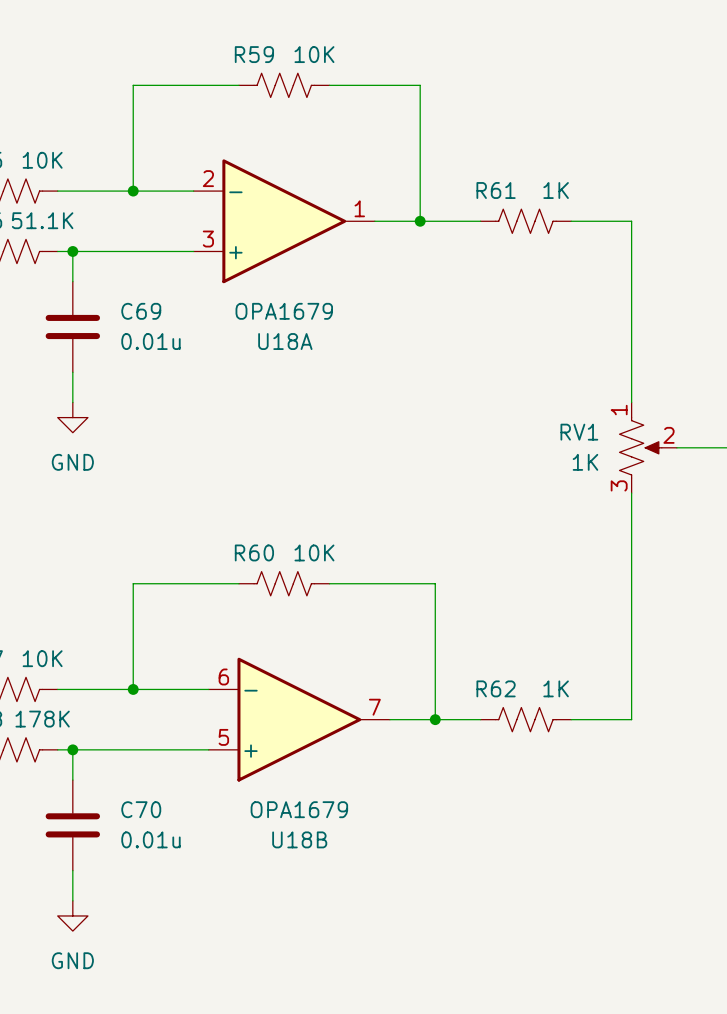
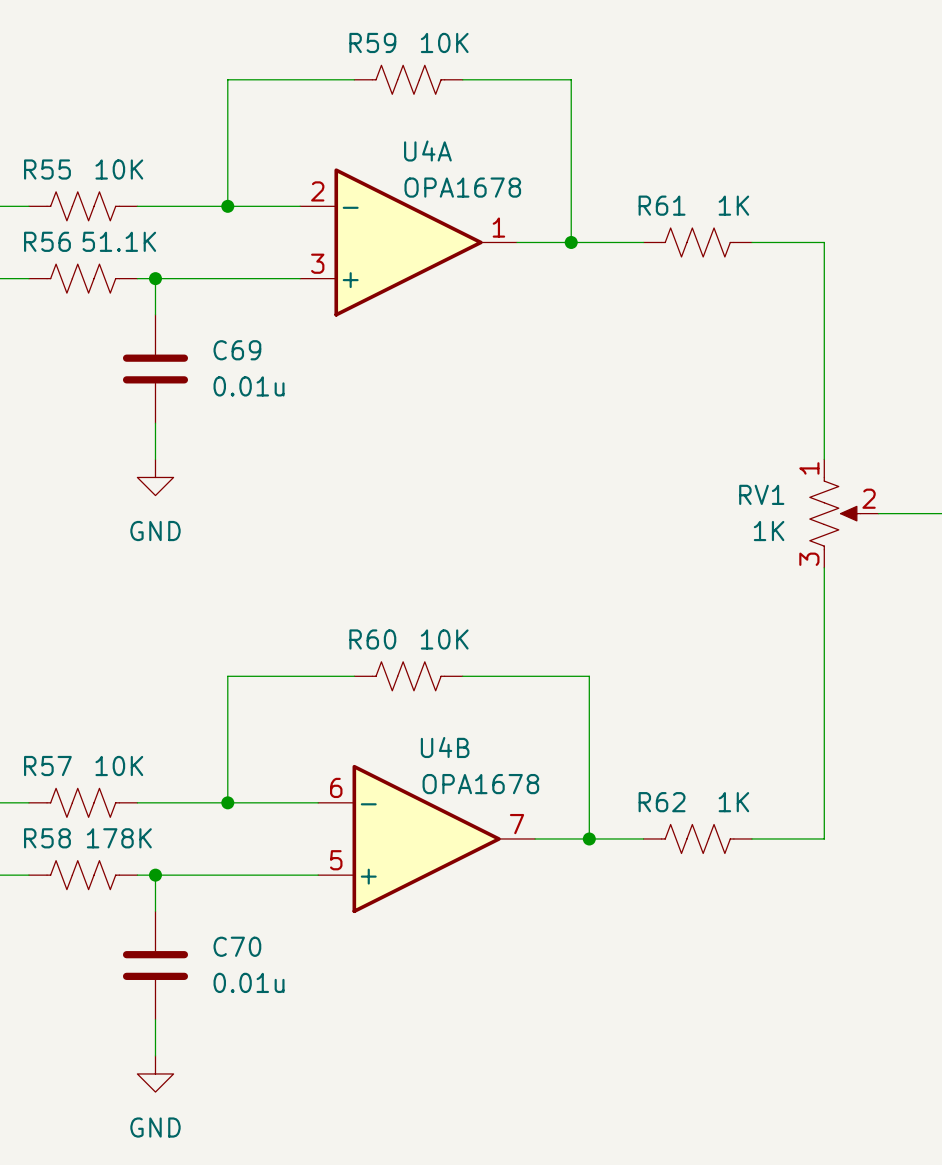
U18A value: OPA1679 (284, 311) -> OPA1678 (462, 187)
U18A name: U18A (285, 341) -> U4A (427, 151)
U18B value: OPA1679 (299, 809) -> OPA1678 (480, 784)
U18B name: U18B (299, 839) -> U4B (445, 747)

